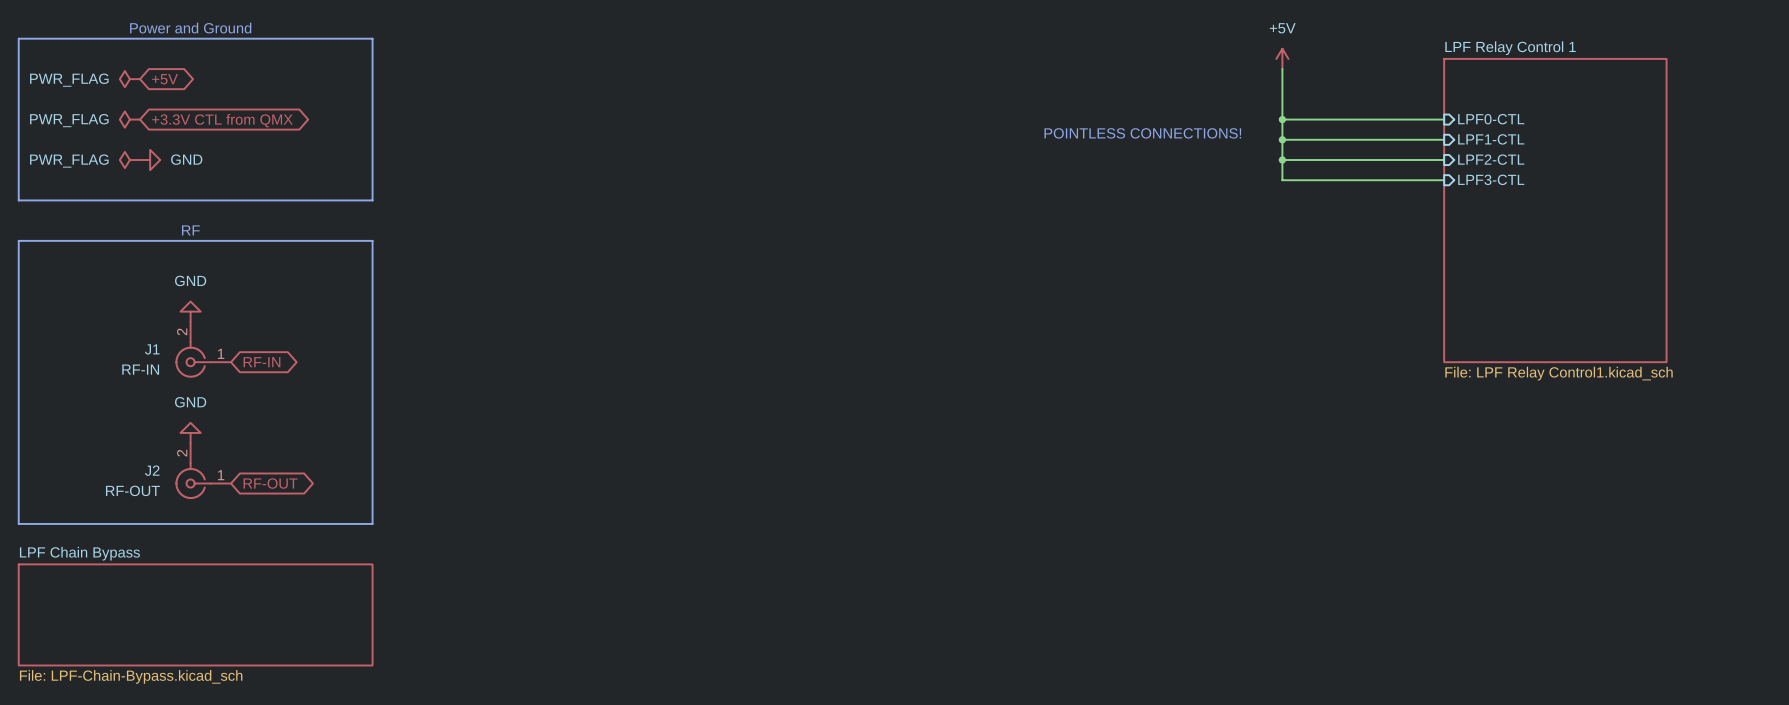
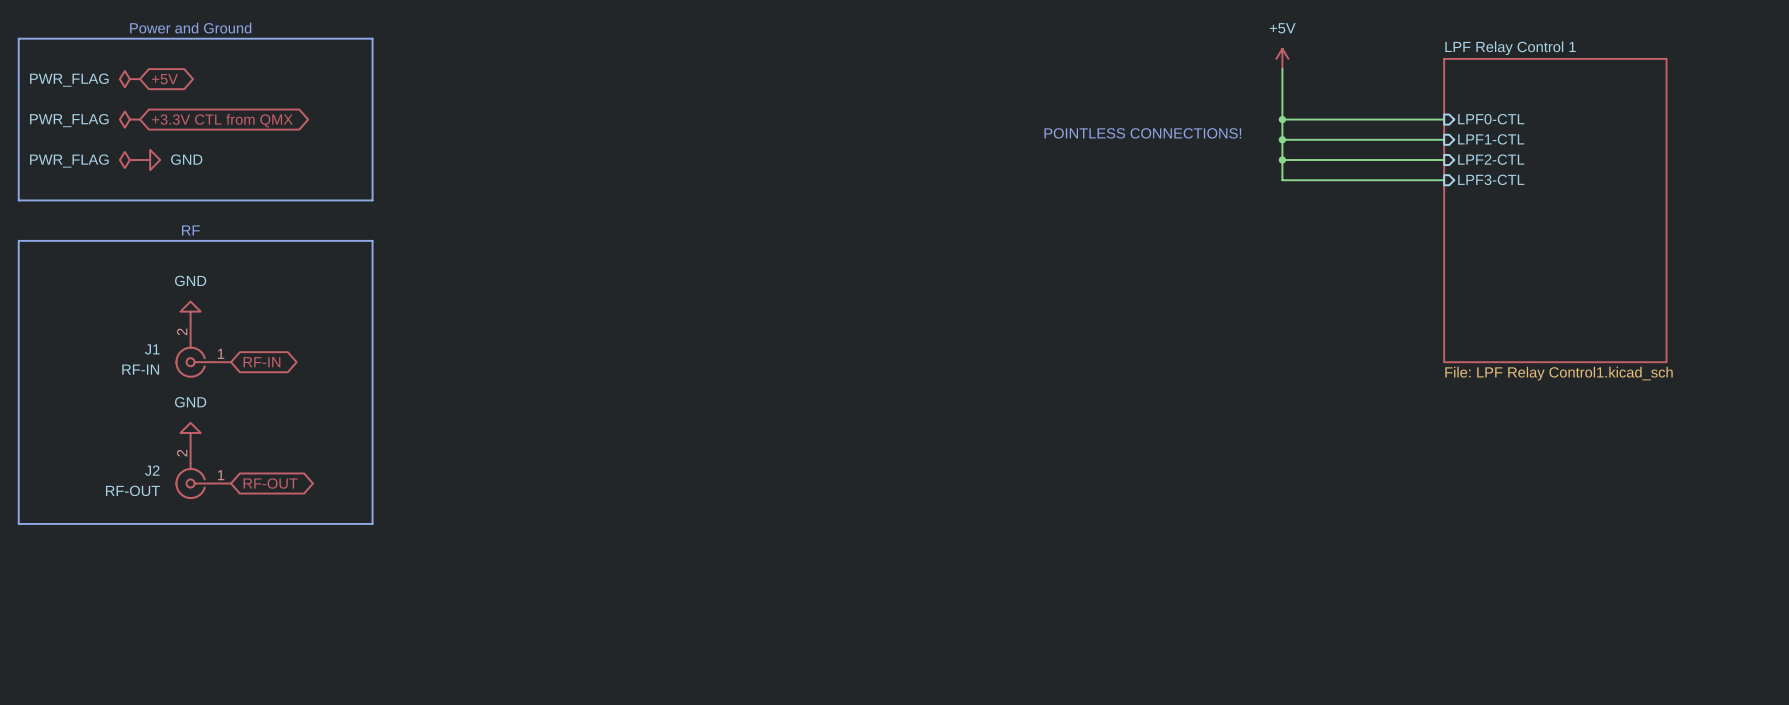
sheet LPF Chain Bypass: File: LPF-Chain-Bypass.kicad_sch (195, 614) -> none

